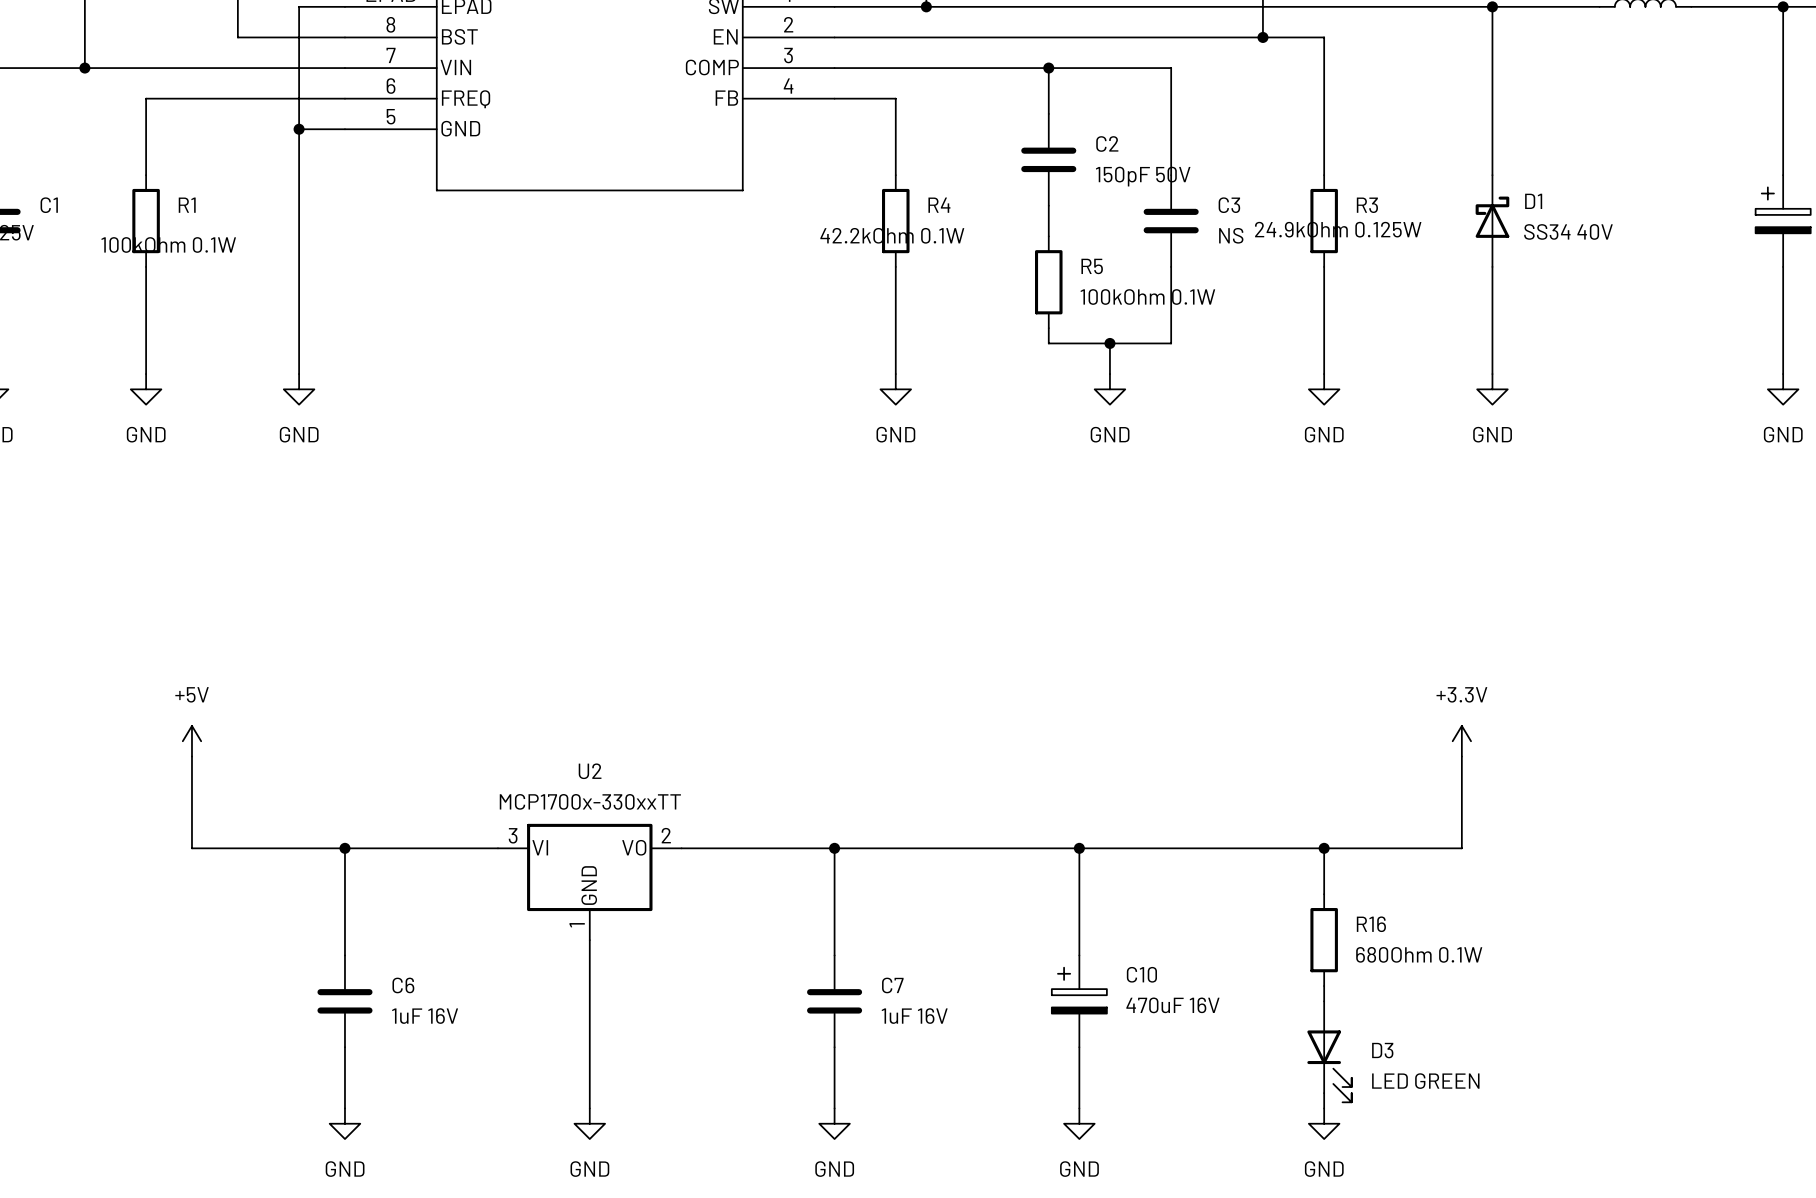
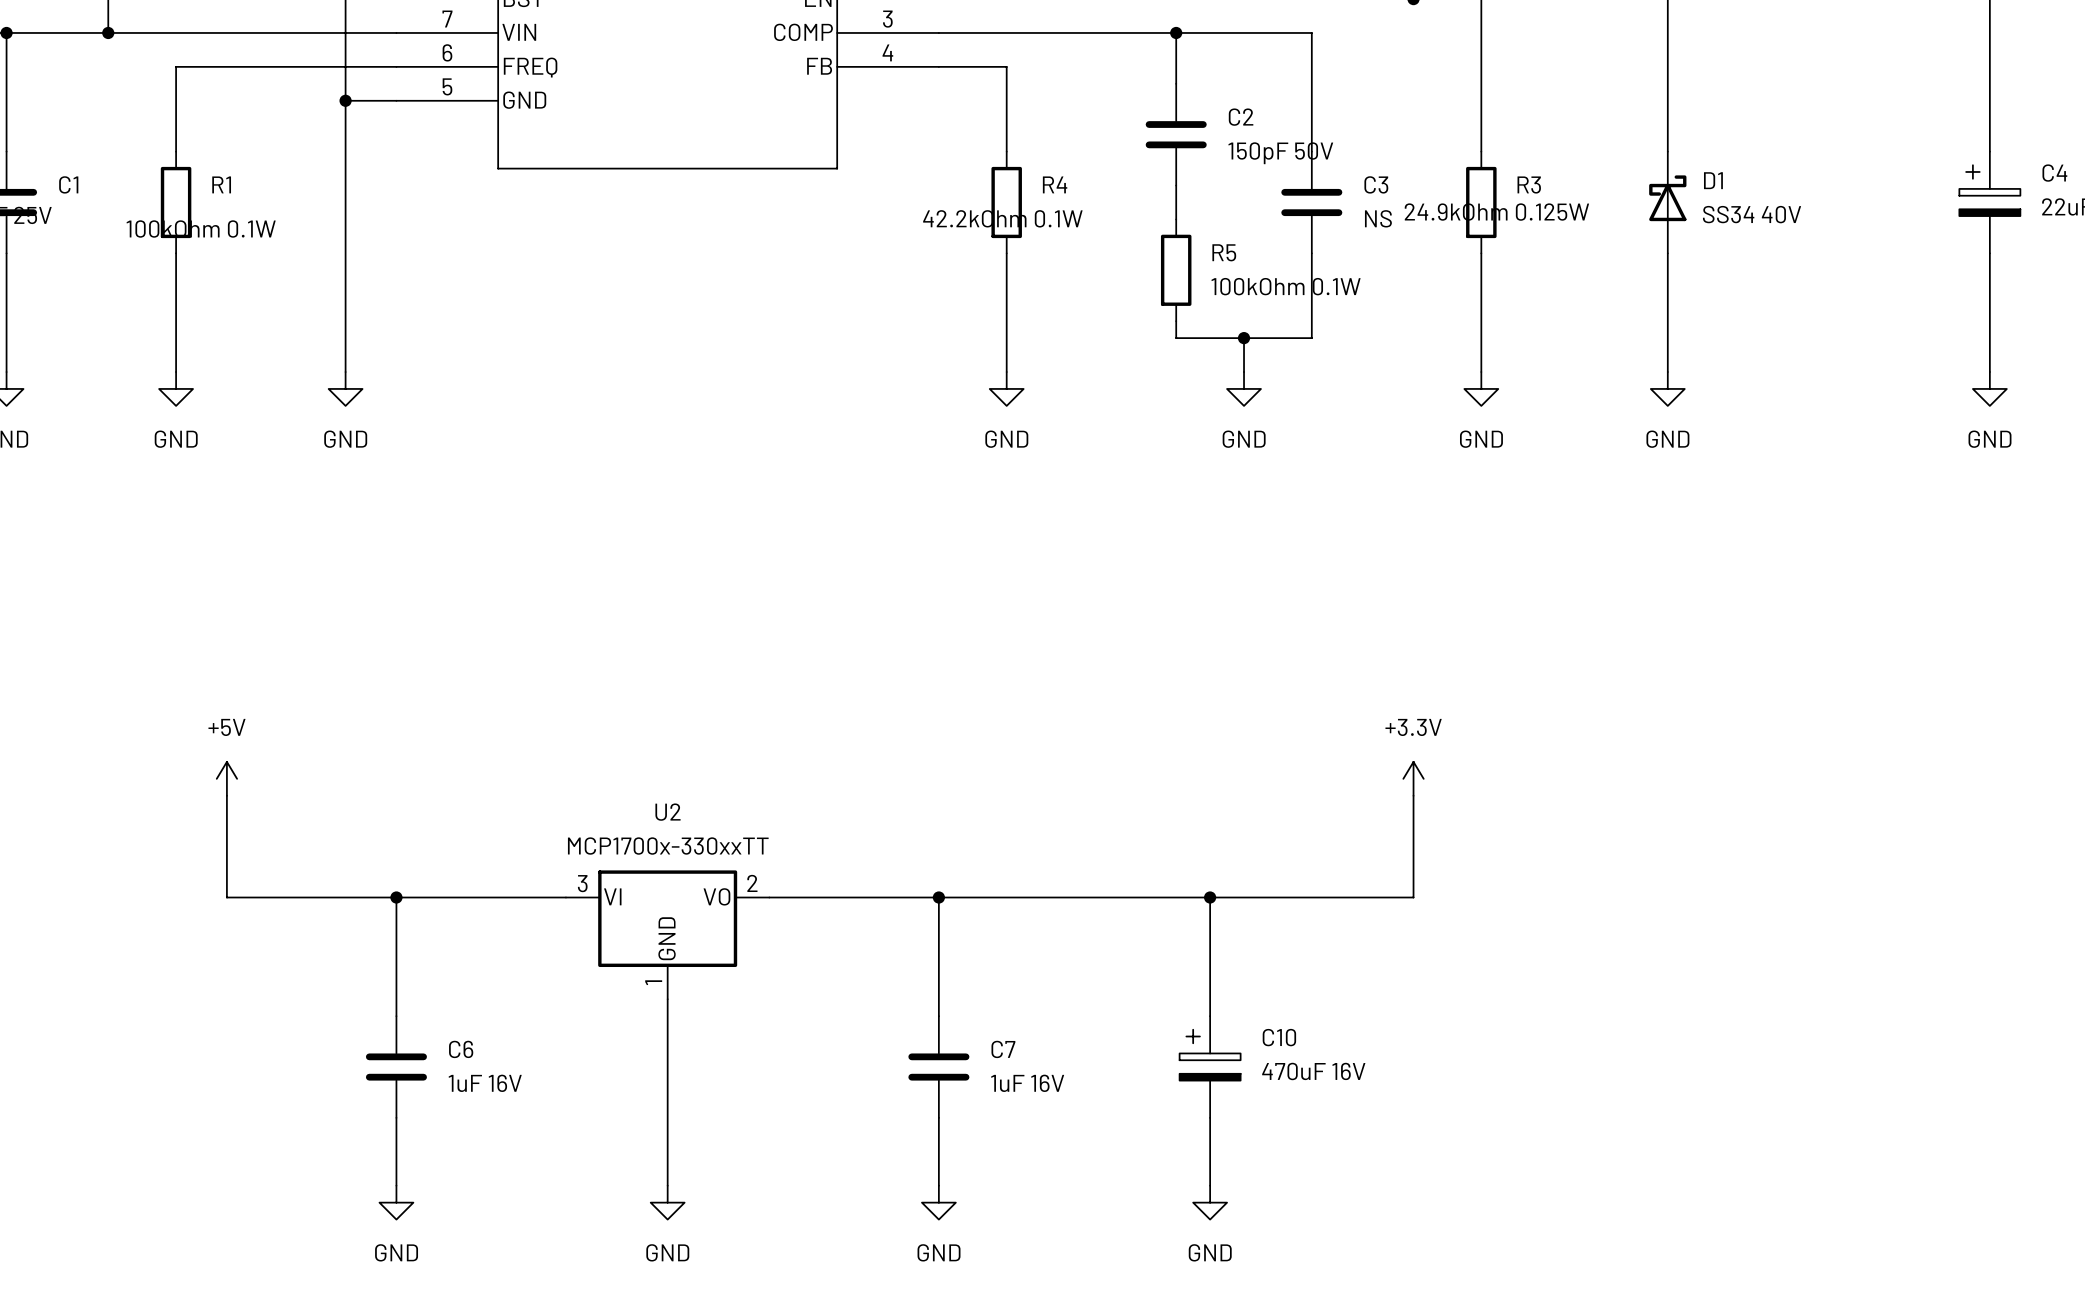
power symbol position: +3.3V (1461, 741) -> +3.3V (1413, 778)
wire: (1461, 756) (1461, 848) (1262, 848) -> (1413, 795) (1413, 897)
wire: (1324, 848) (1324, 894) -> none
junction: (1324, 848) -> none
R16: 680Ohm 0.1W (1324, 940) -> none
wire: (1324, 986) (1324, 1001) -> none
D3: LED GREEN (1329, 1051) -> none
wire: (1324, 1093) (1324, 1108) -> none
power symbol: GND (1324, 1123) -> none

